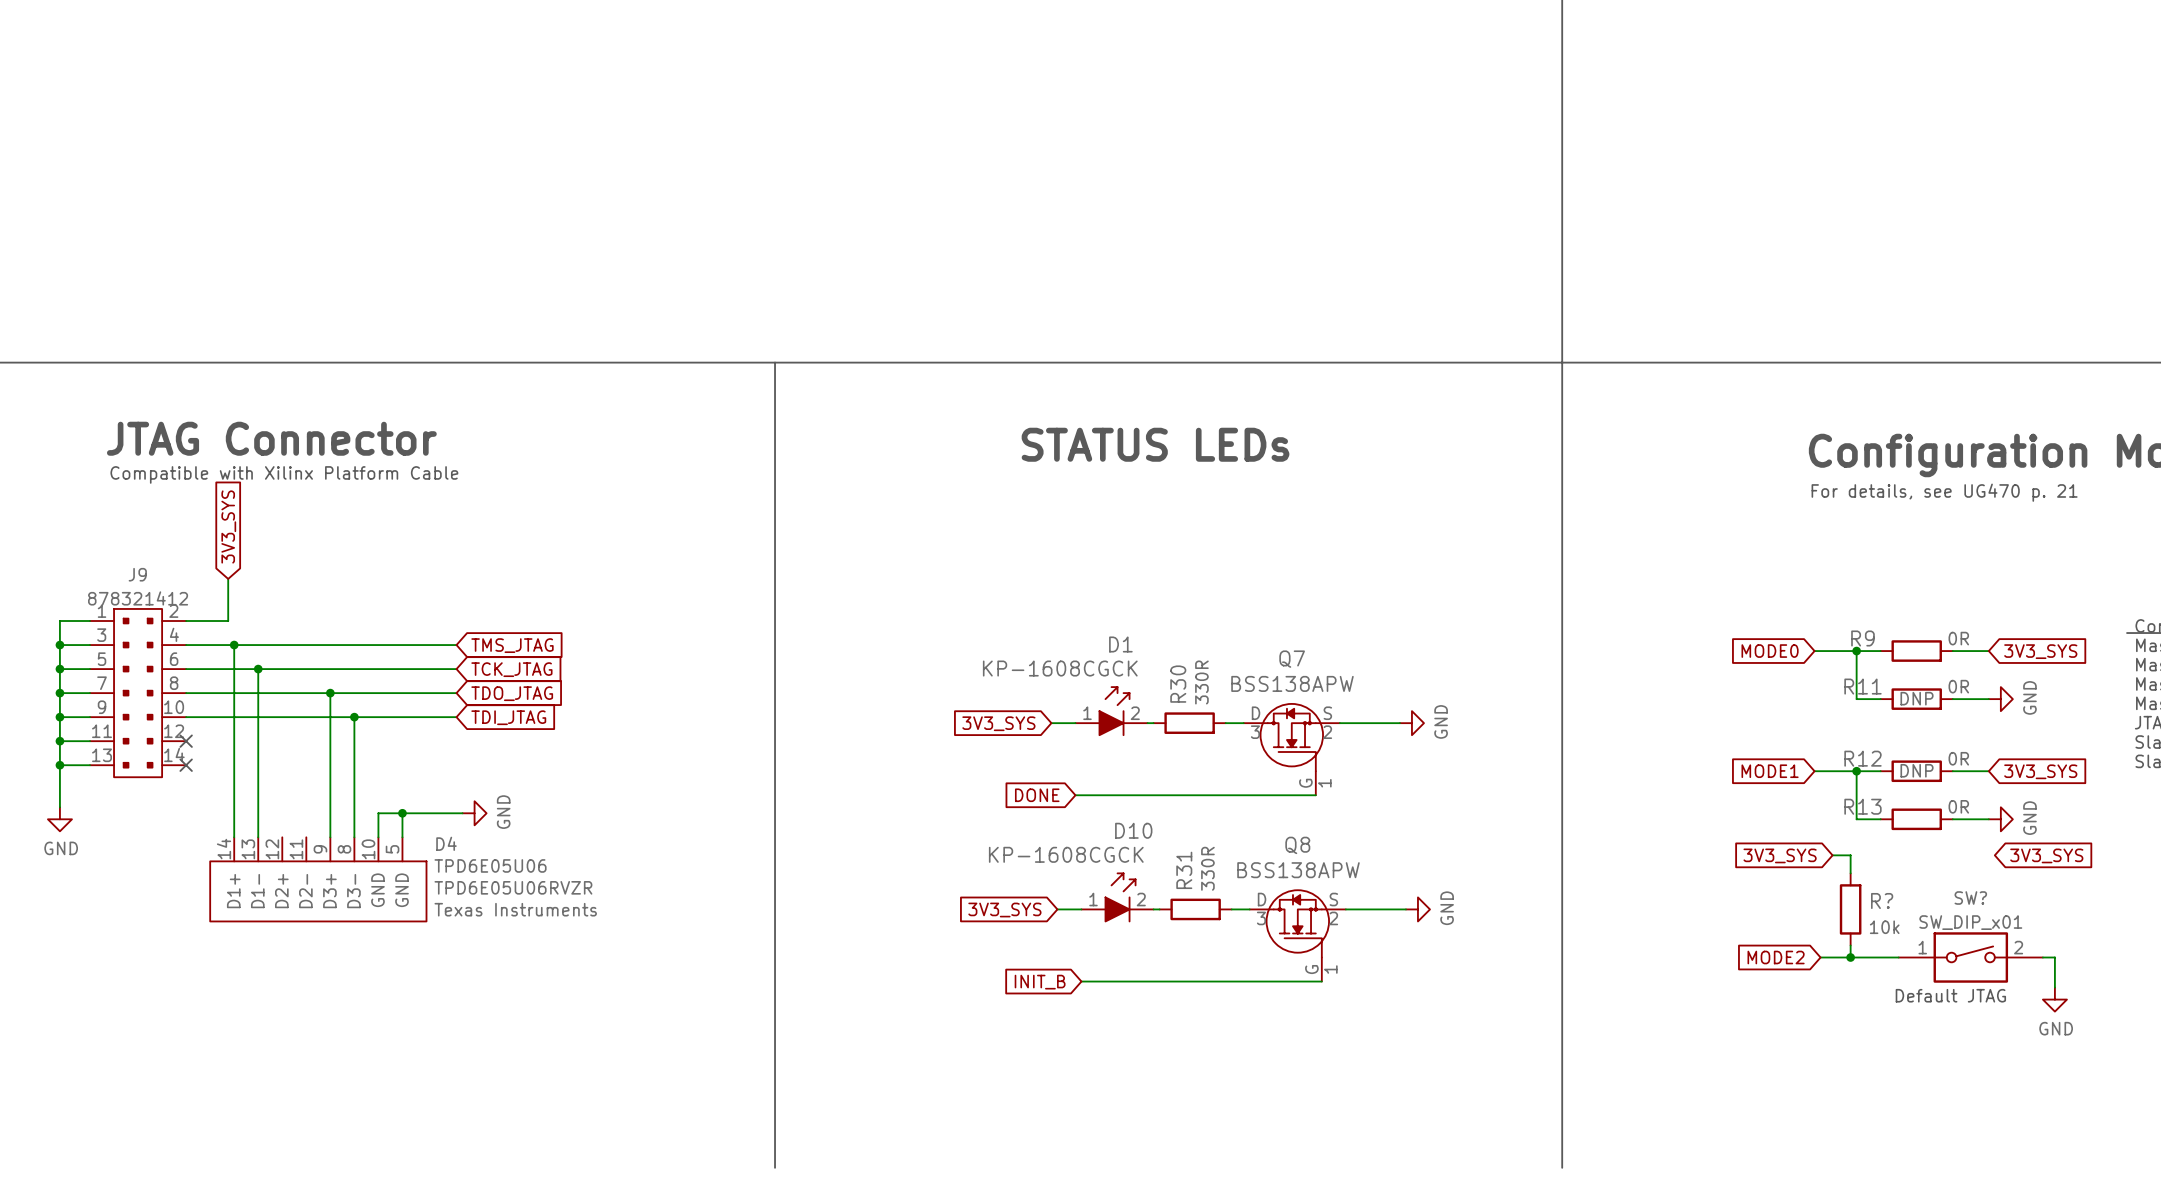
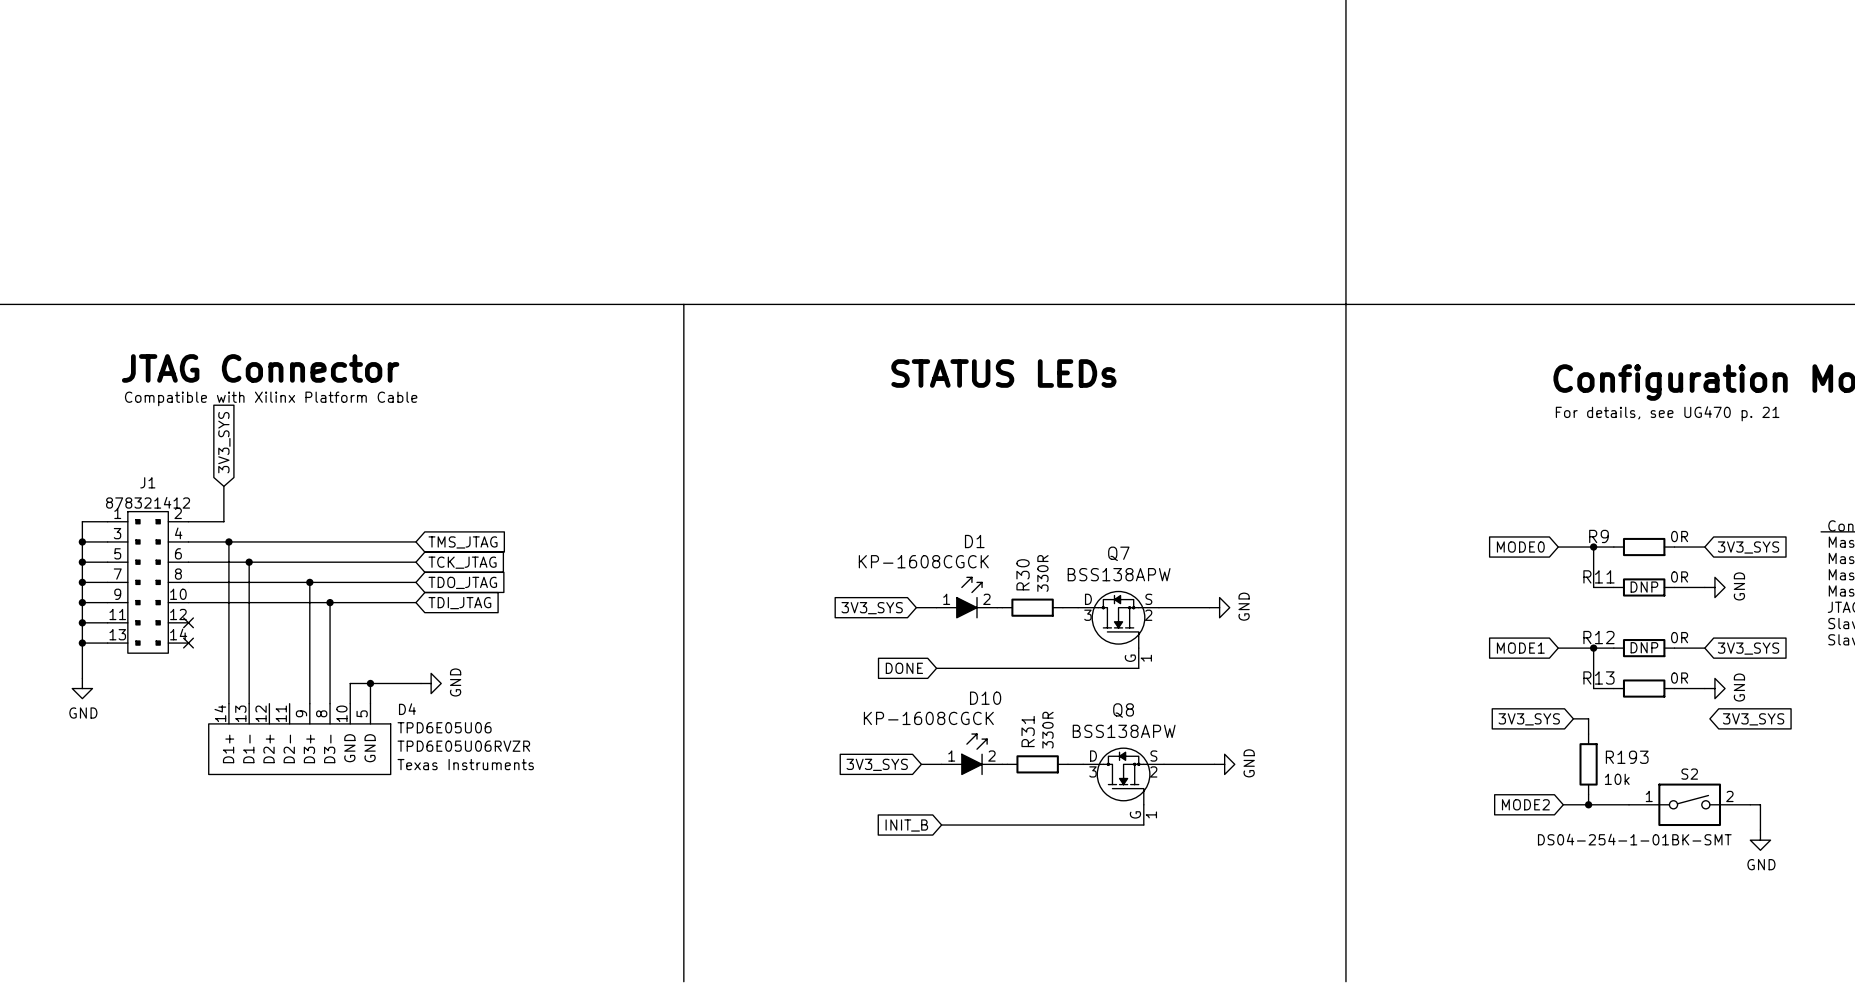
J9 name: J9 (137, 574) -> J1 (147, 482)
SW? name: SW? (1970, 898) -> S2 (1689, 774)
R? name: R? (1882, 900) -> R193 (1627, 757)
SW? value: SW_DIP_x01 (1970, 922) -> DS04-254-1-01BK-SMT (1634, 839)
text: Default JTAG (1950, 995) -> none

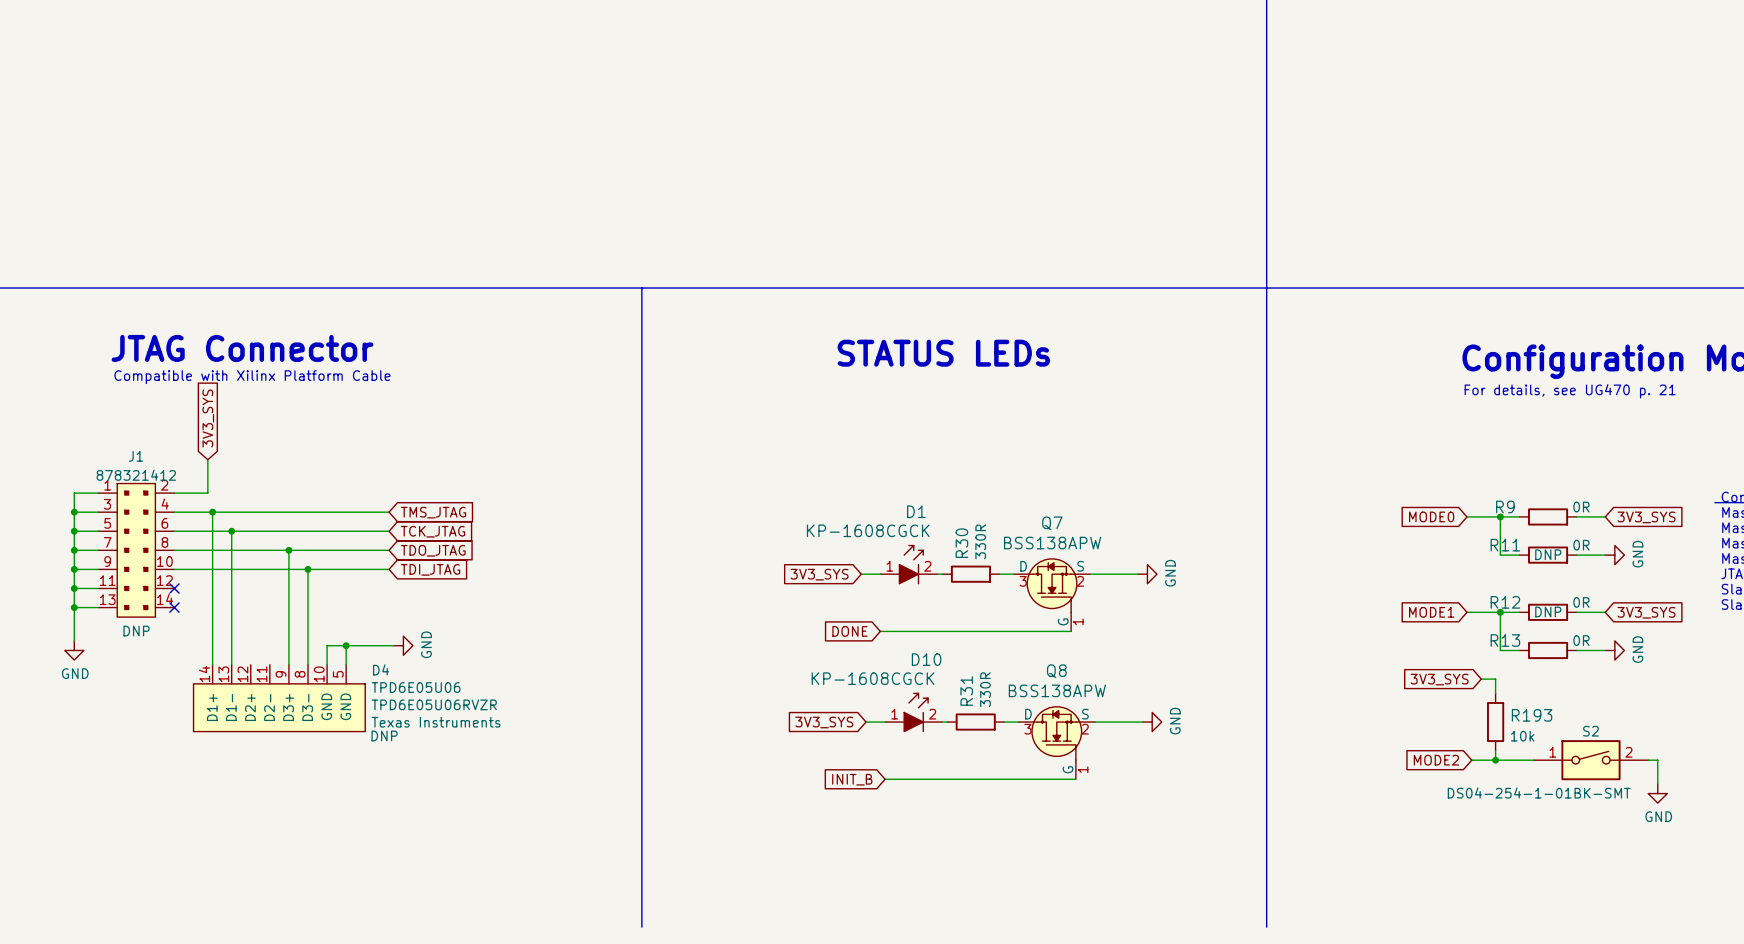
J1 text: none -> DNP (136, 631)
global label: 3V3_SYS (1753, 719) -> none
D4 text: none -> DNP (384, 735)

